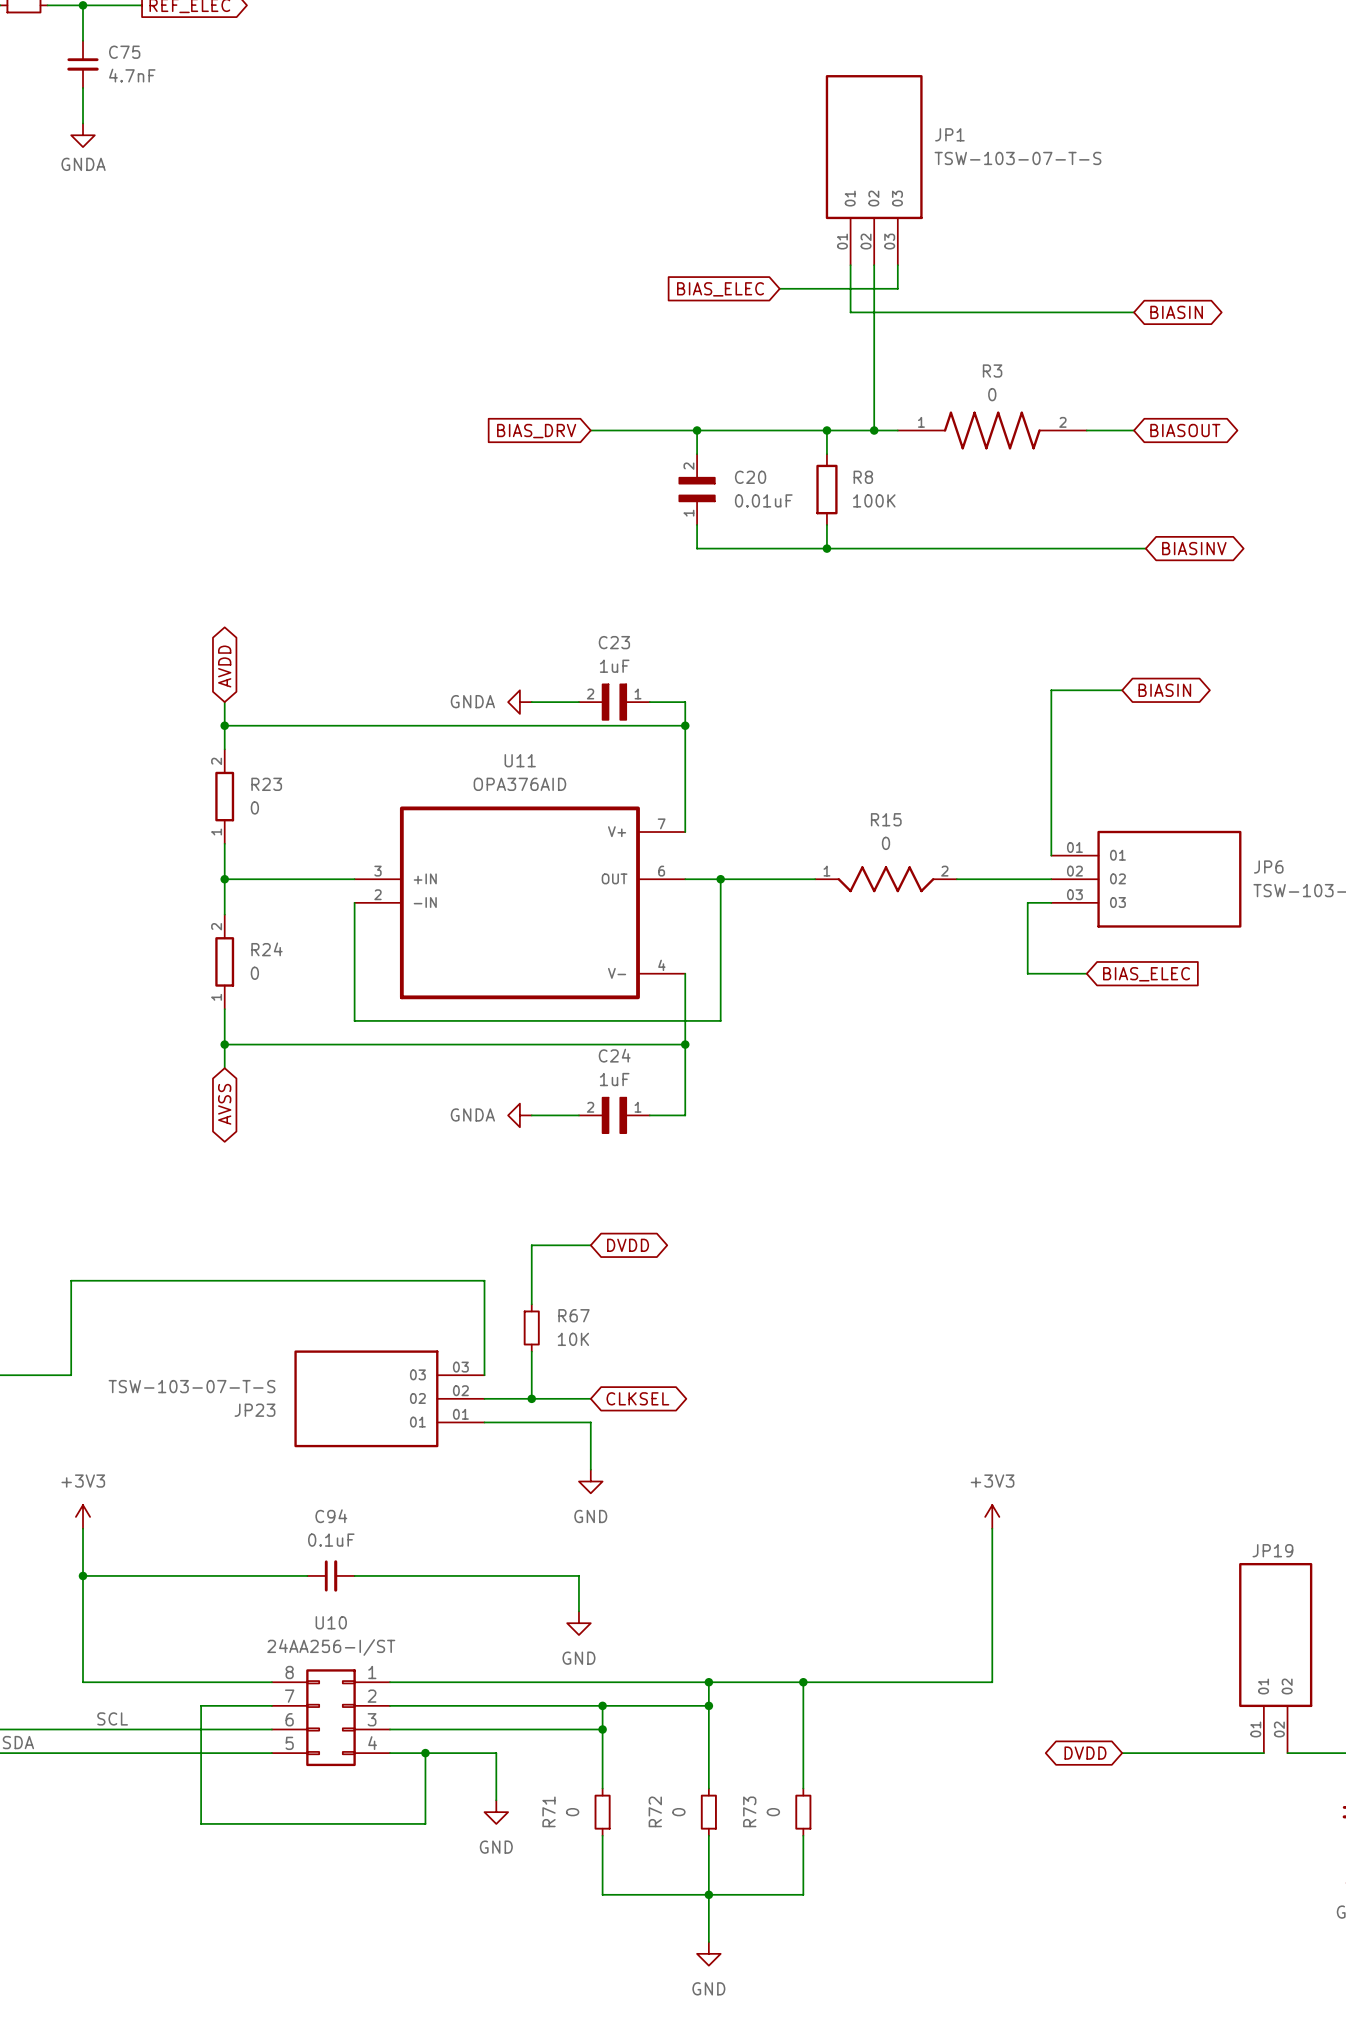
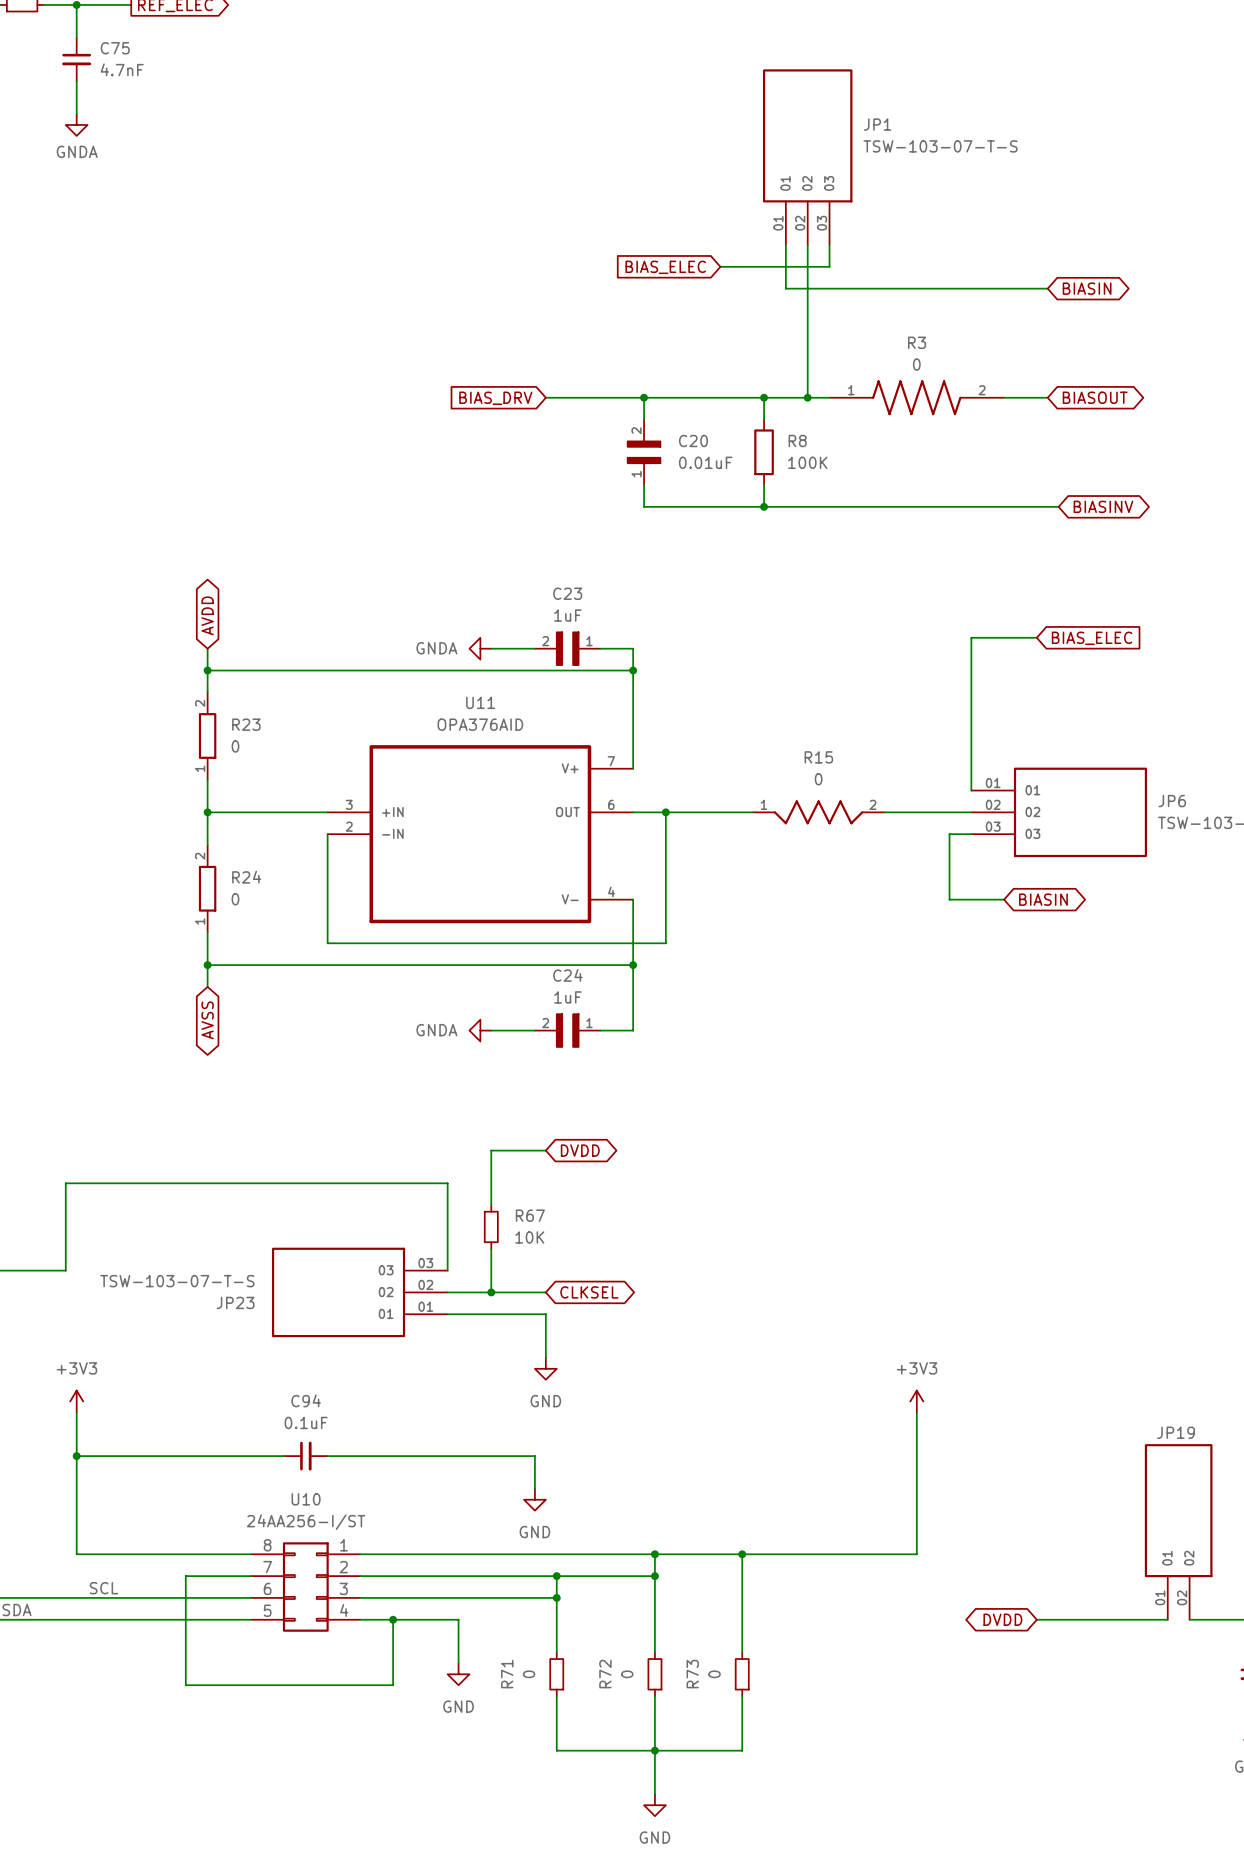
global label shape: bidirectional (1164, 690) -> input (1092, 638)
global label: BIASIN (1164, 690) -> BIAS_ELEC (1092, 638)
global label shape: input (1146, 974) -> bidirectional (1043, 899)
global label: BIAS_ELEC (1146, 974) -> BIASIN (1043, 899)

